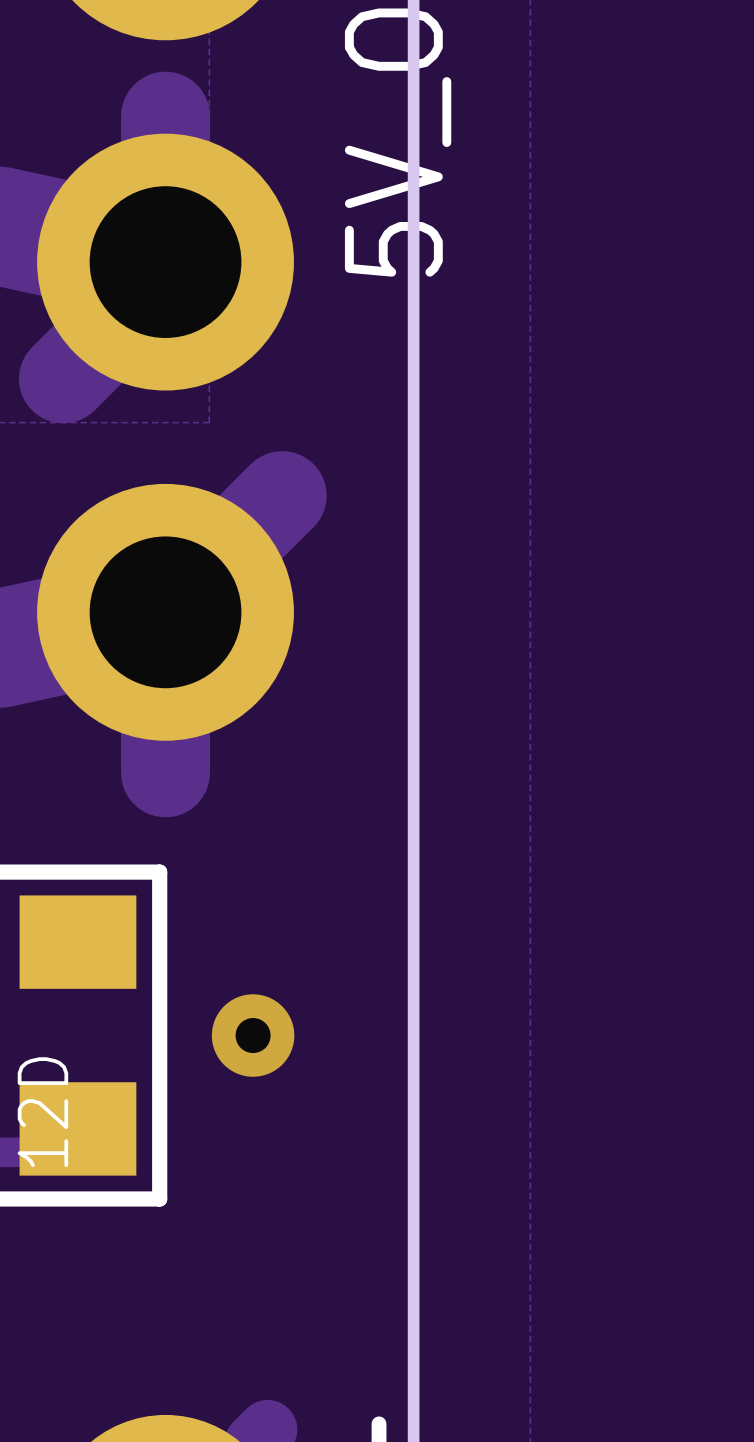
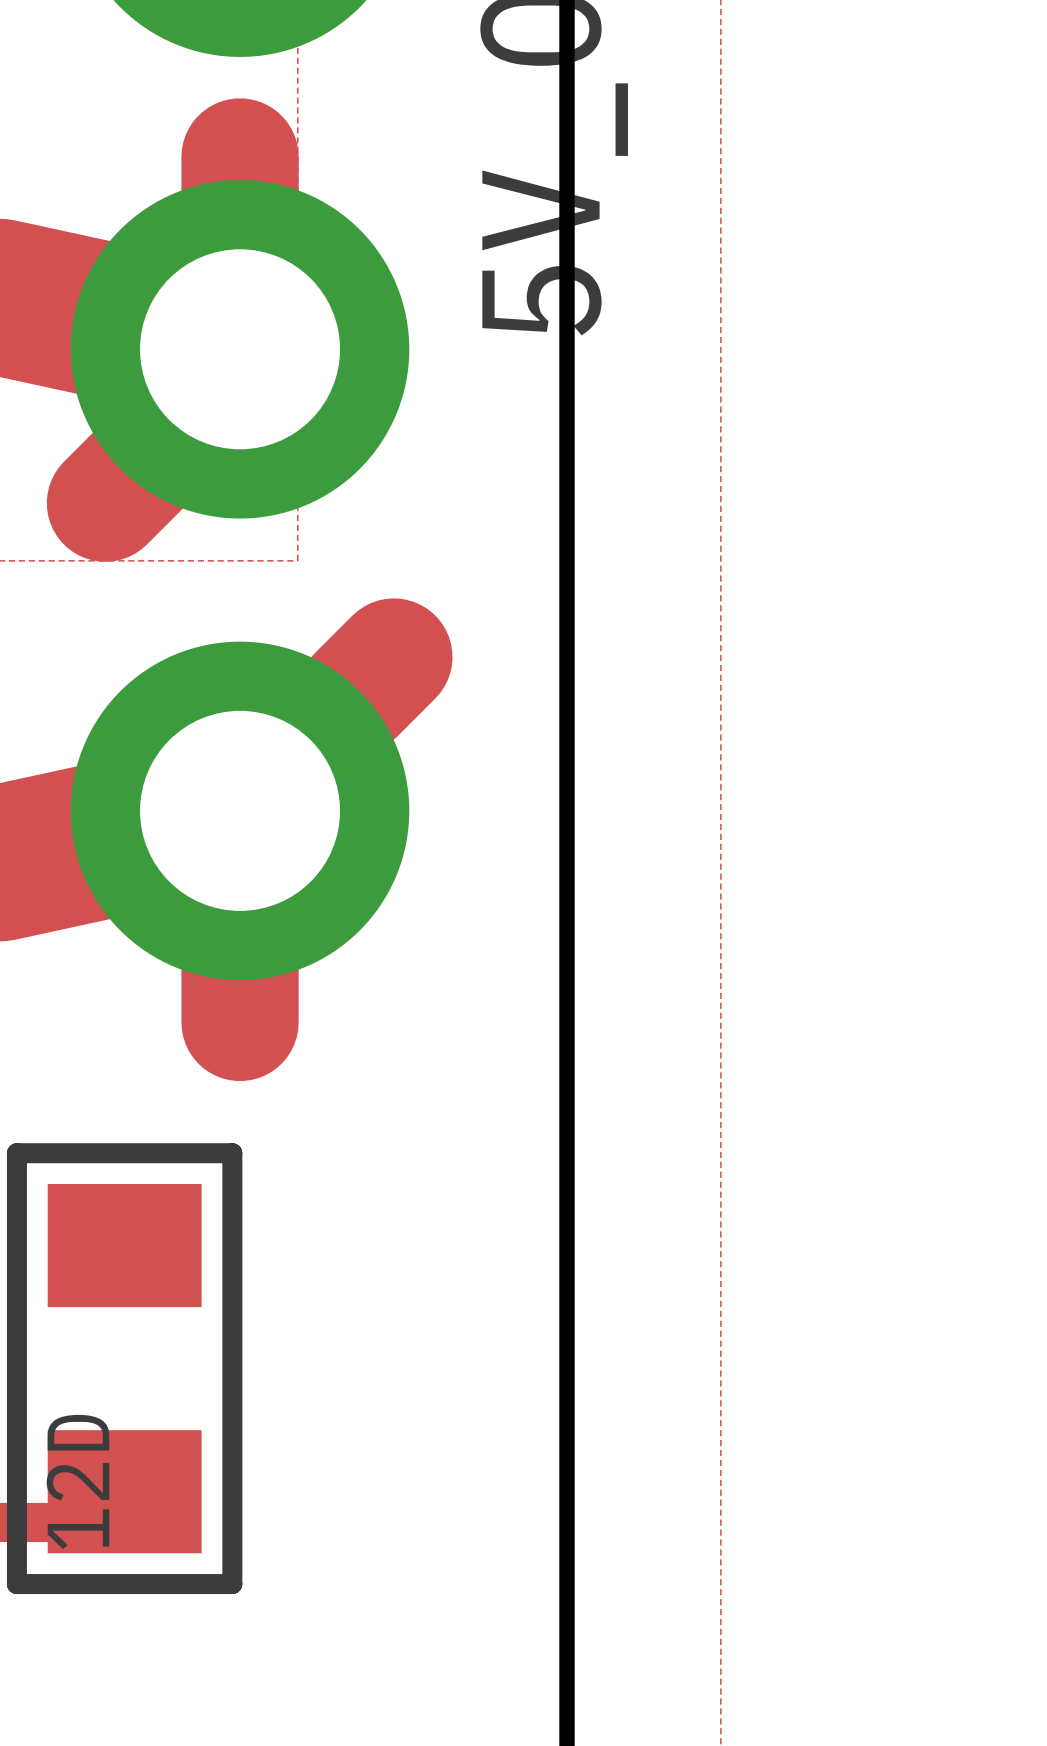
via: (253, 1035) -> none

